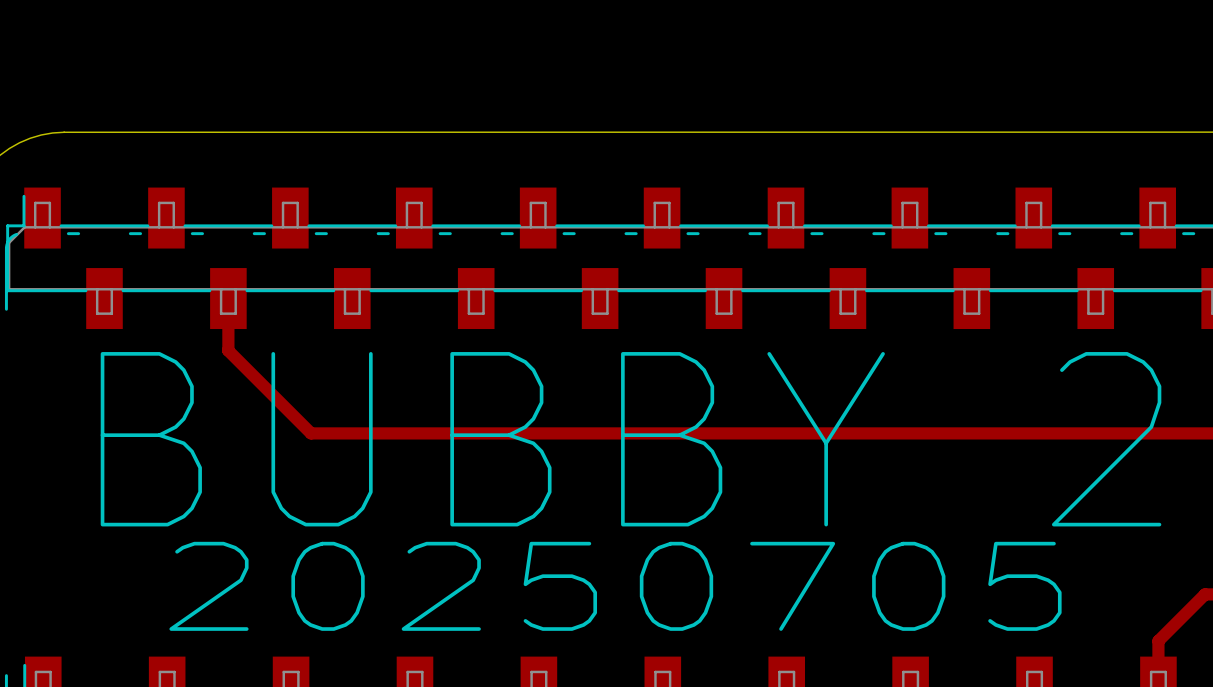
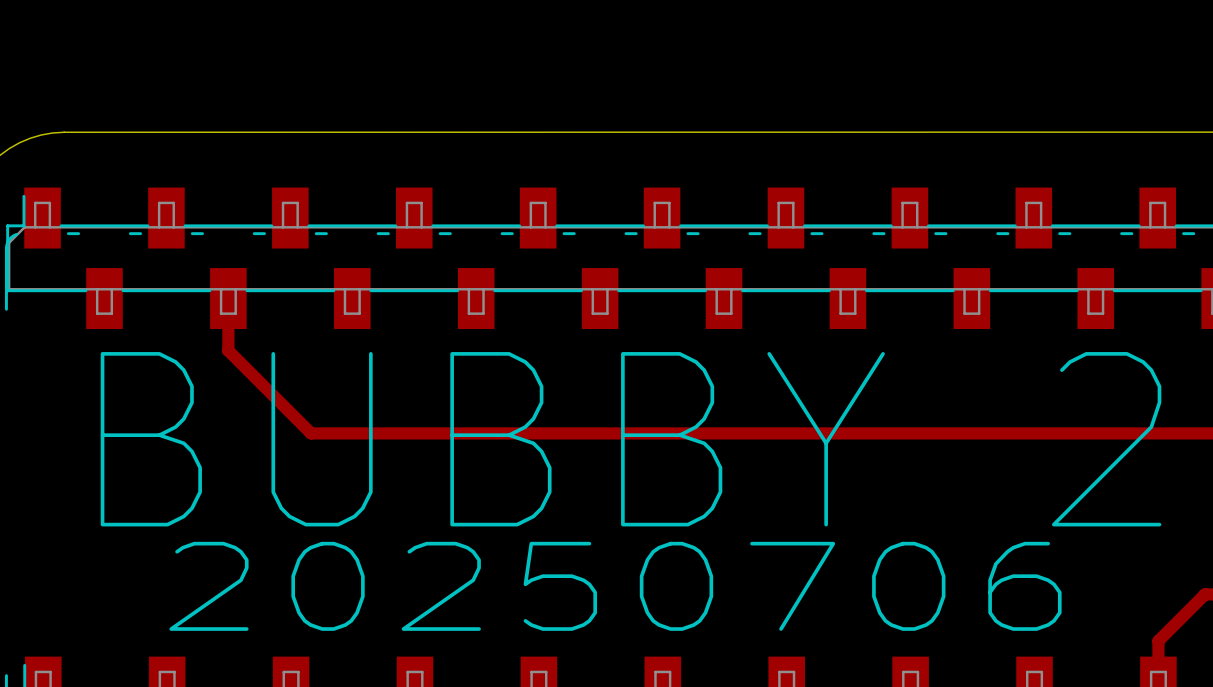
text: 20250705 (615, 586) -> 20250706 (615, 586)

